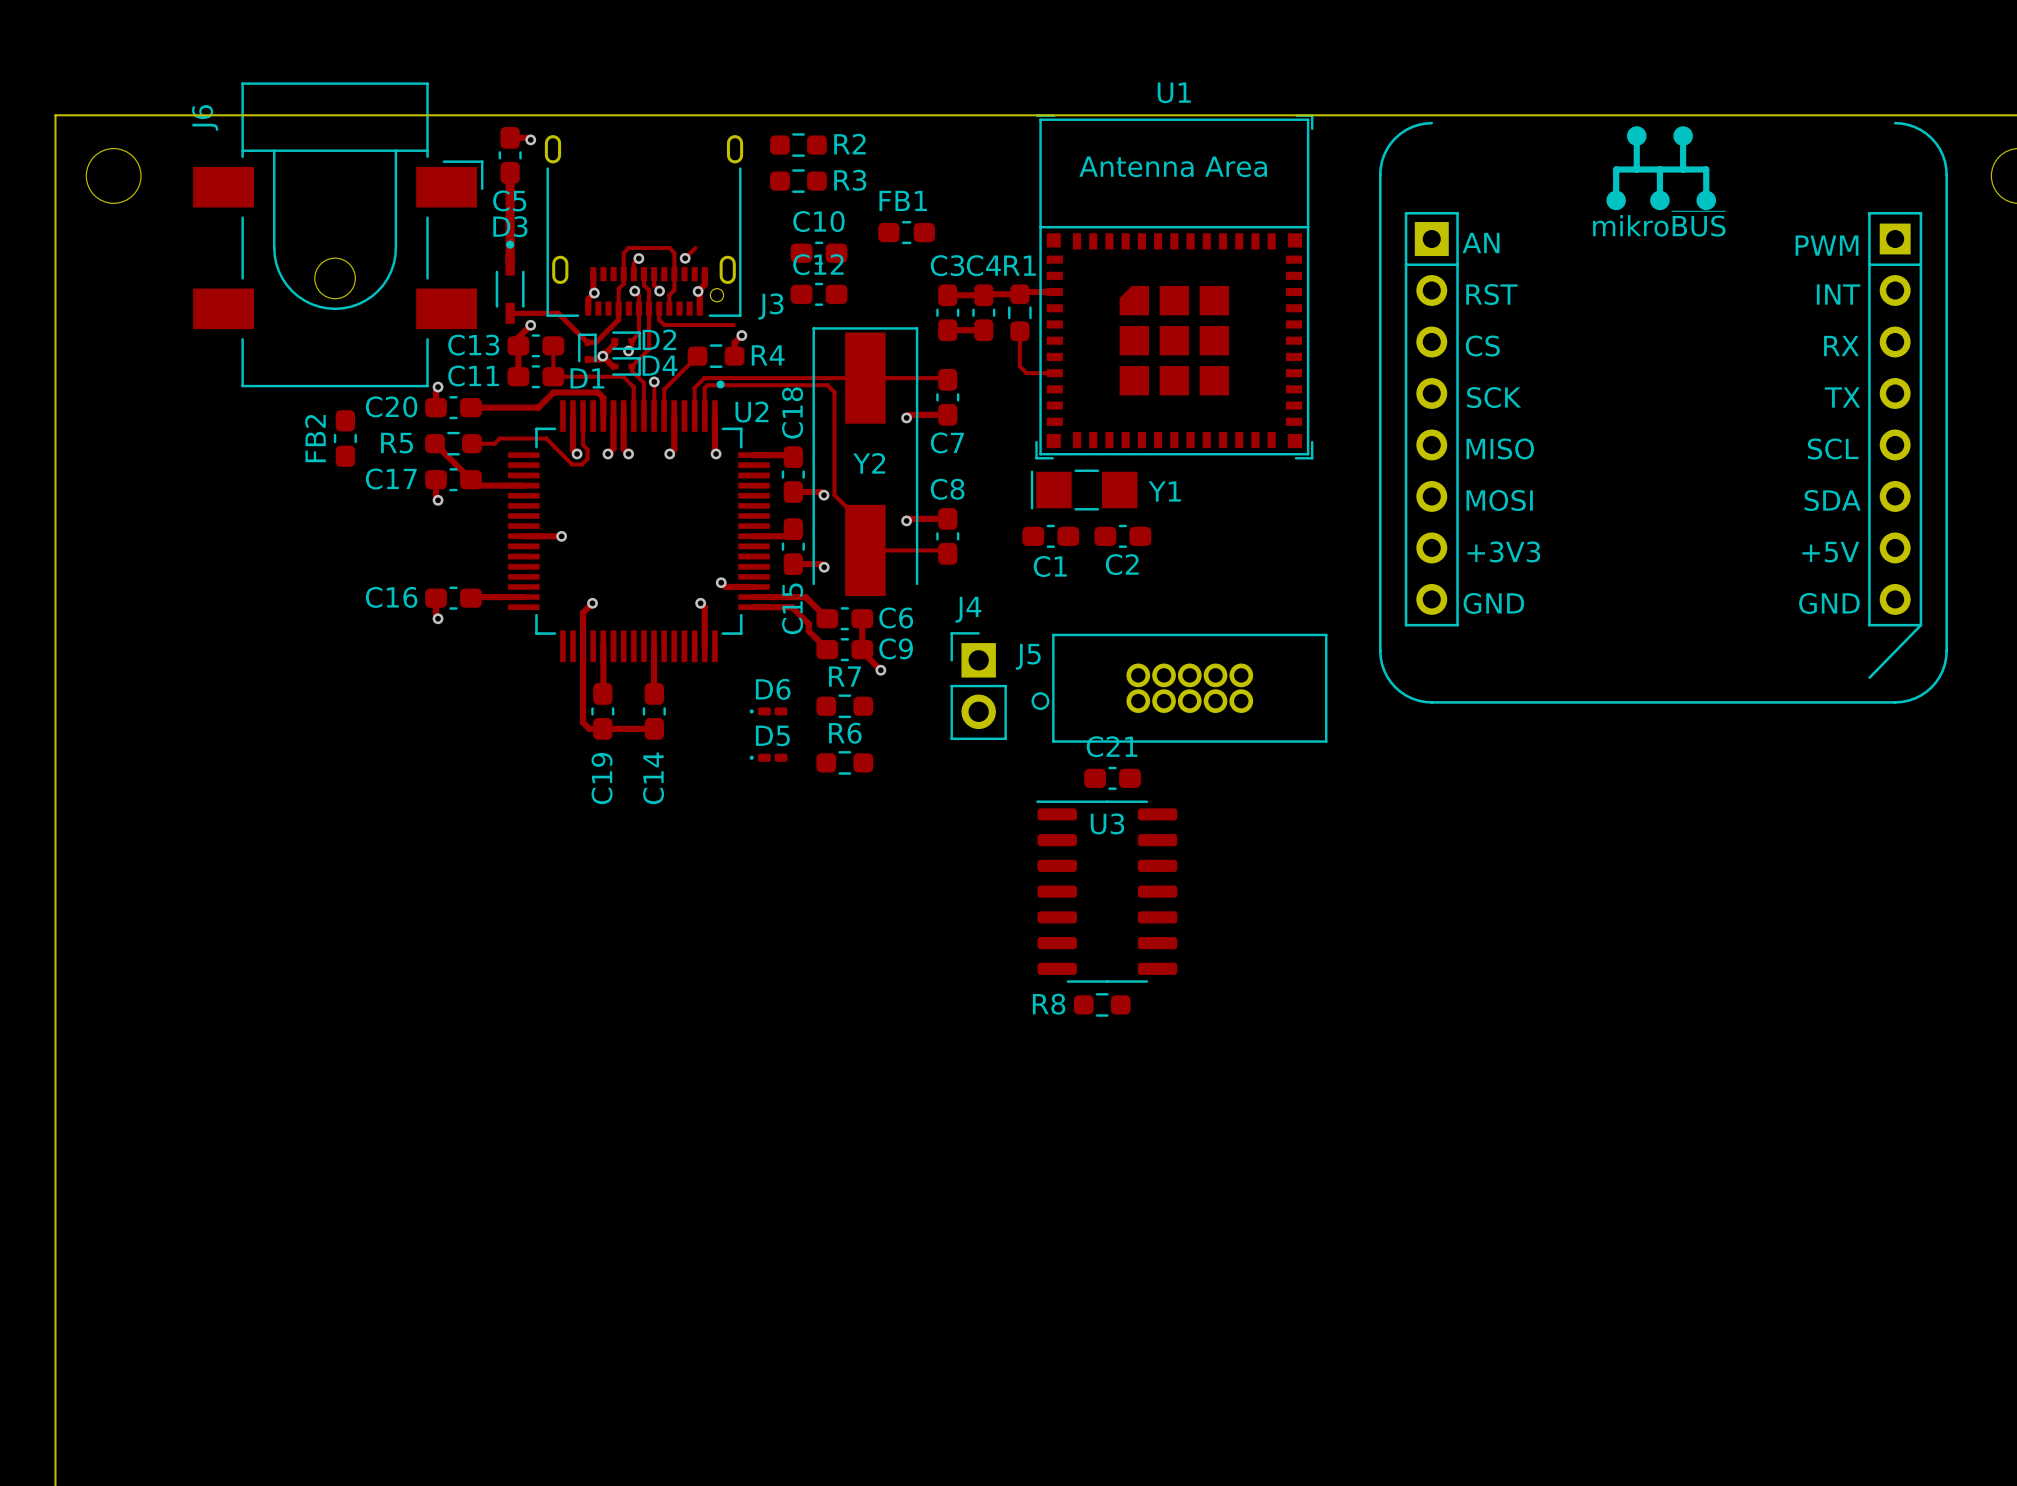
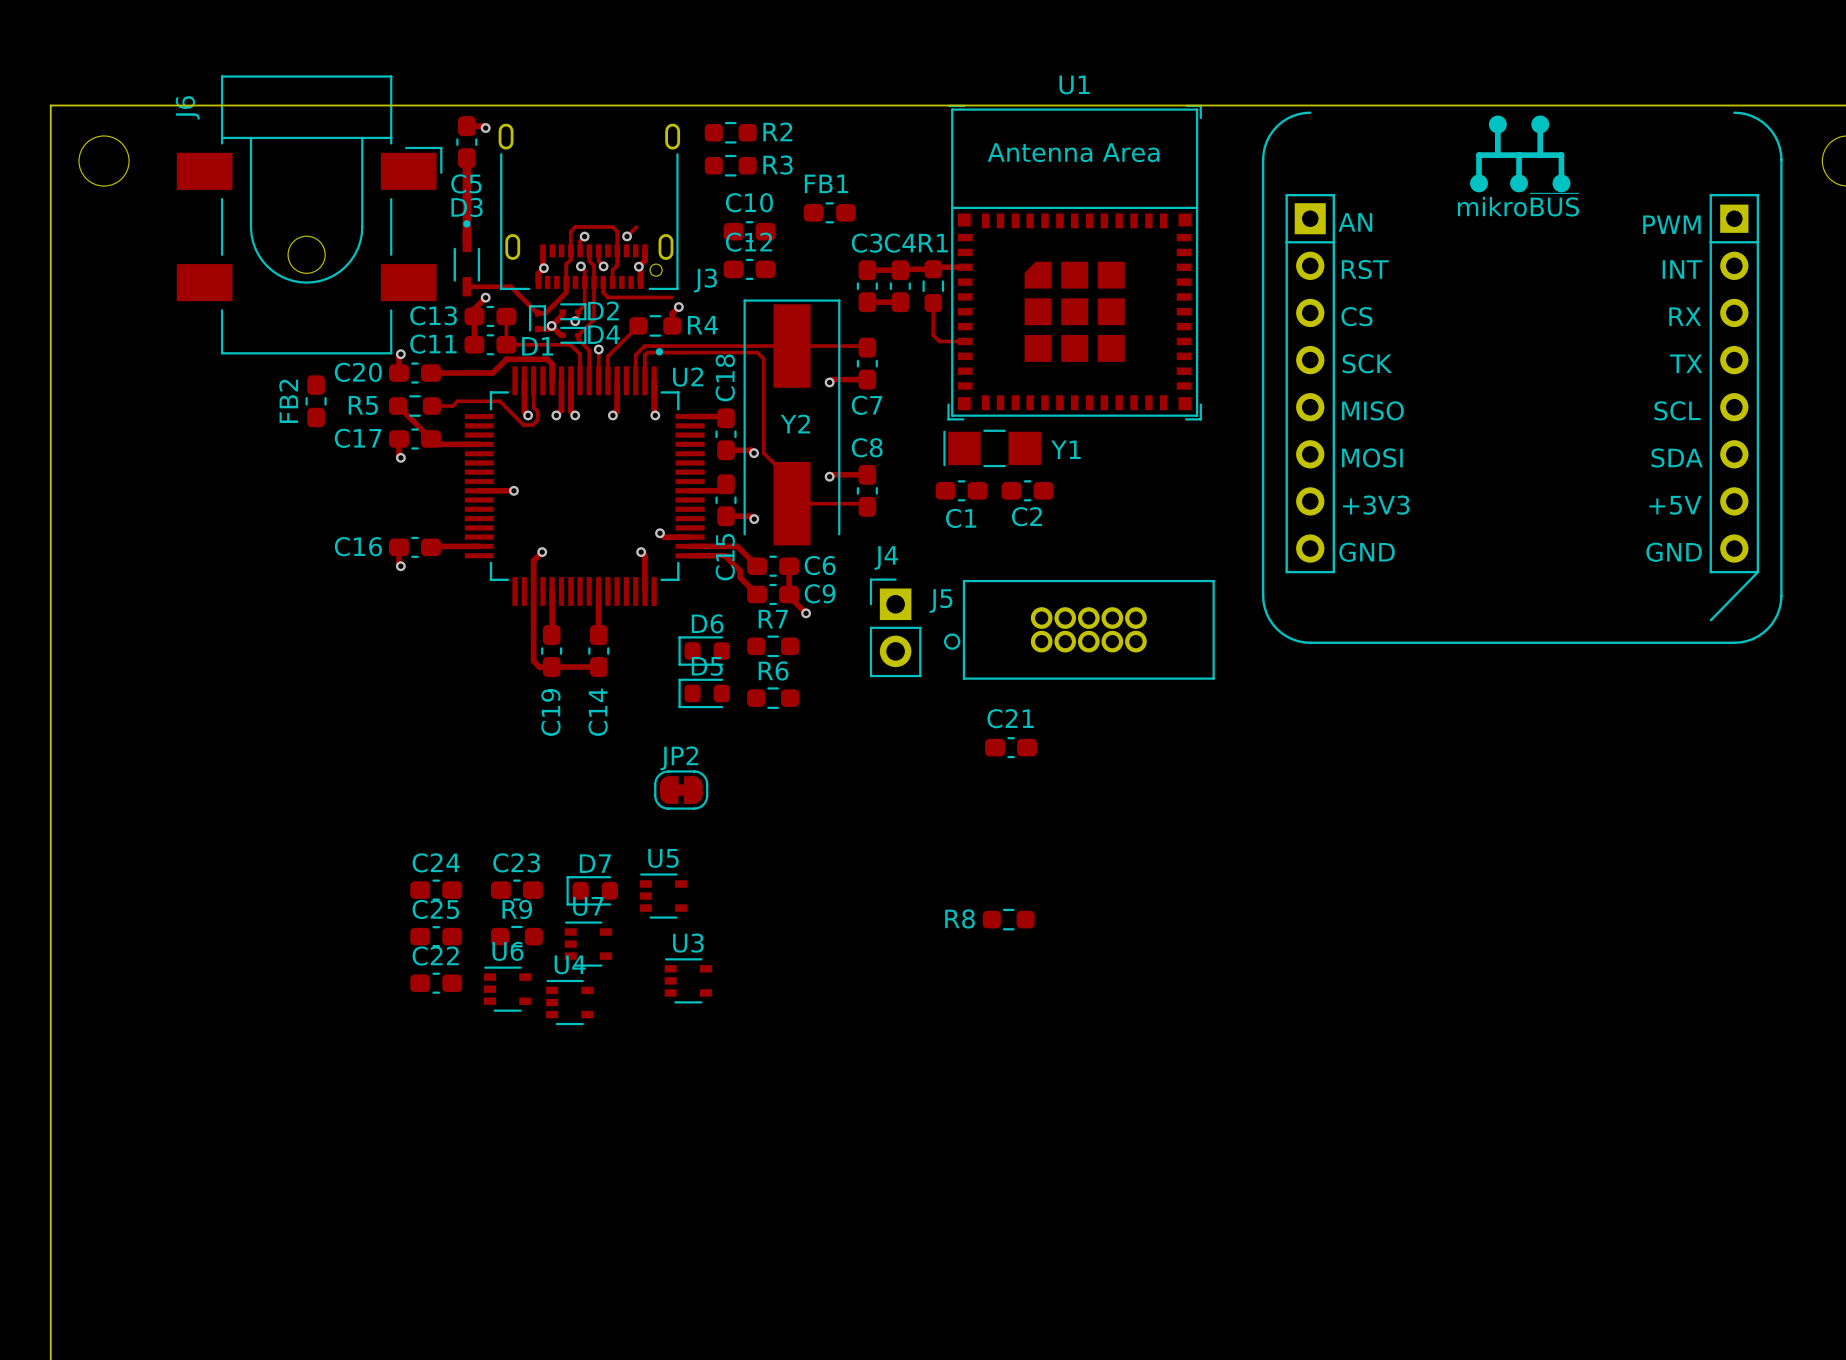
D6 footprint: [749, 707, 788, 716] -> [678, 636, 730, 666]
D5 footprint: [749, 753, 788, 762] -> [678, 678, 730, 709]
C21 position: (1112, 778) -> (1011, 747)
U3 footprint: [1036, 800, 1178, 983] -> [664, 958, 712, 1004]
JP2: none -> (681, 790)
C24: none -> (436, 890)
C23: none -> (516, 890)
D7: none -> (592, 890)
U5: none -> (663, 896)
C25: none -> (436, 936)
R9: none -> (516, 936)
U7: none -> (588, 944)
C22: none -> (436, 983)
U6: none -> (507, 989)
U4: none -> (569, 1002)

